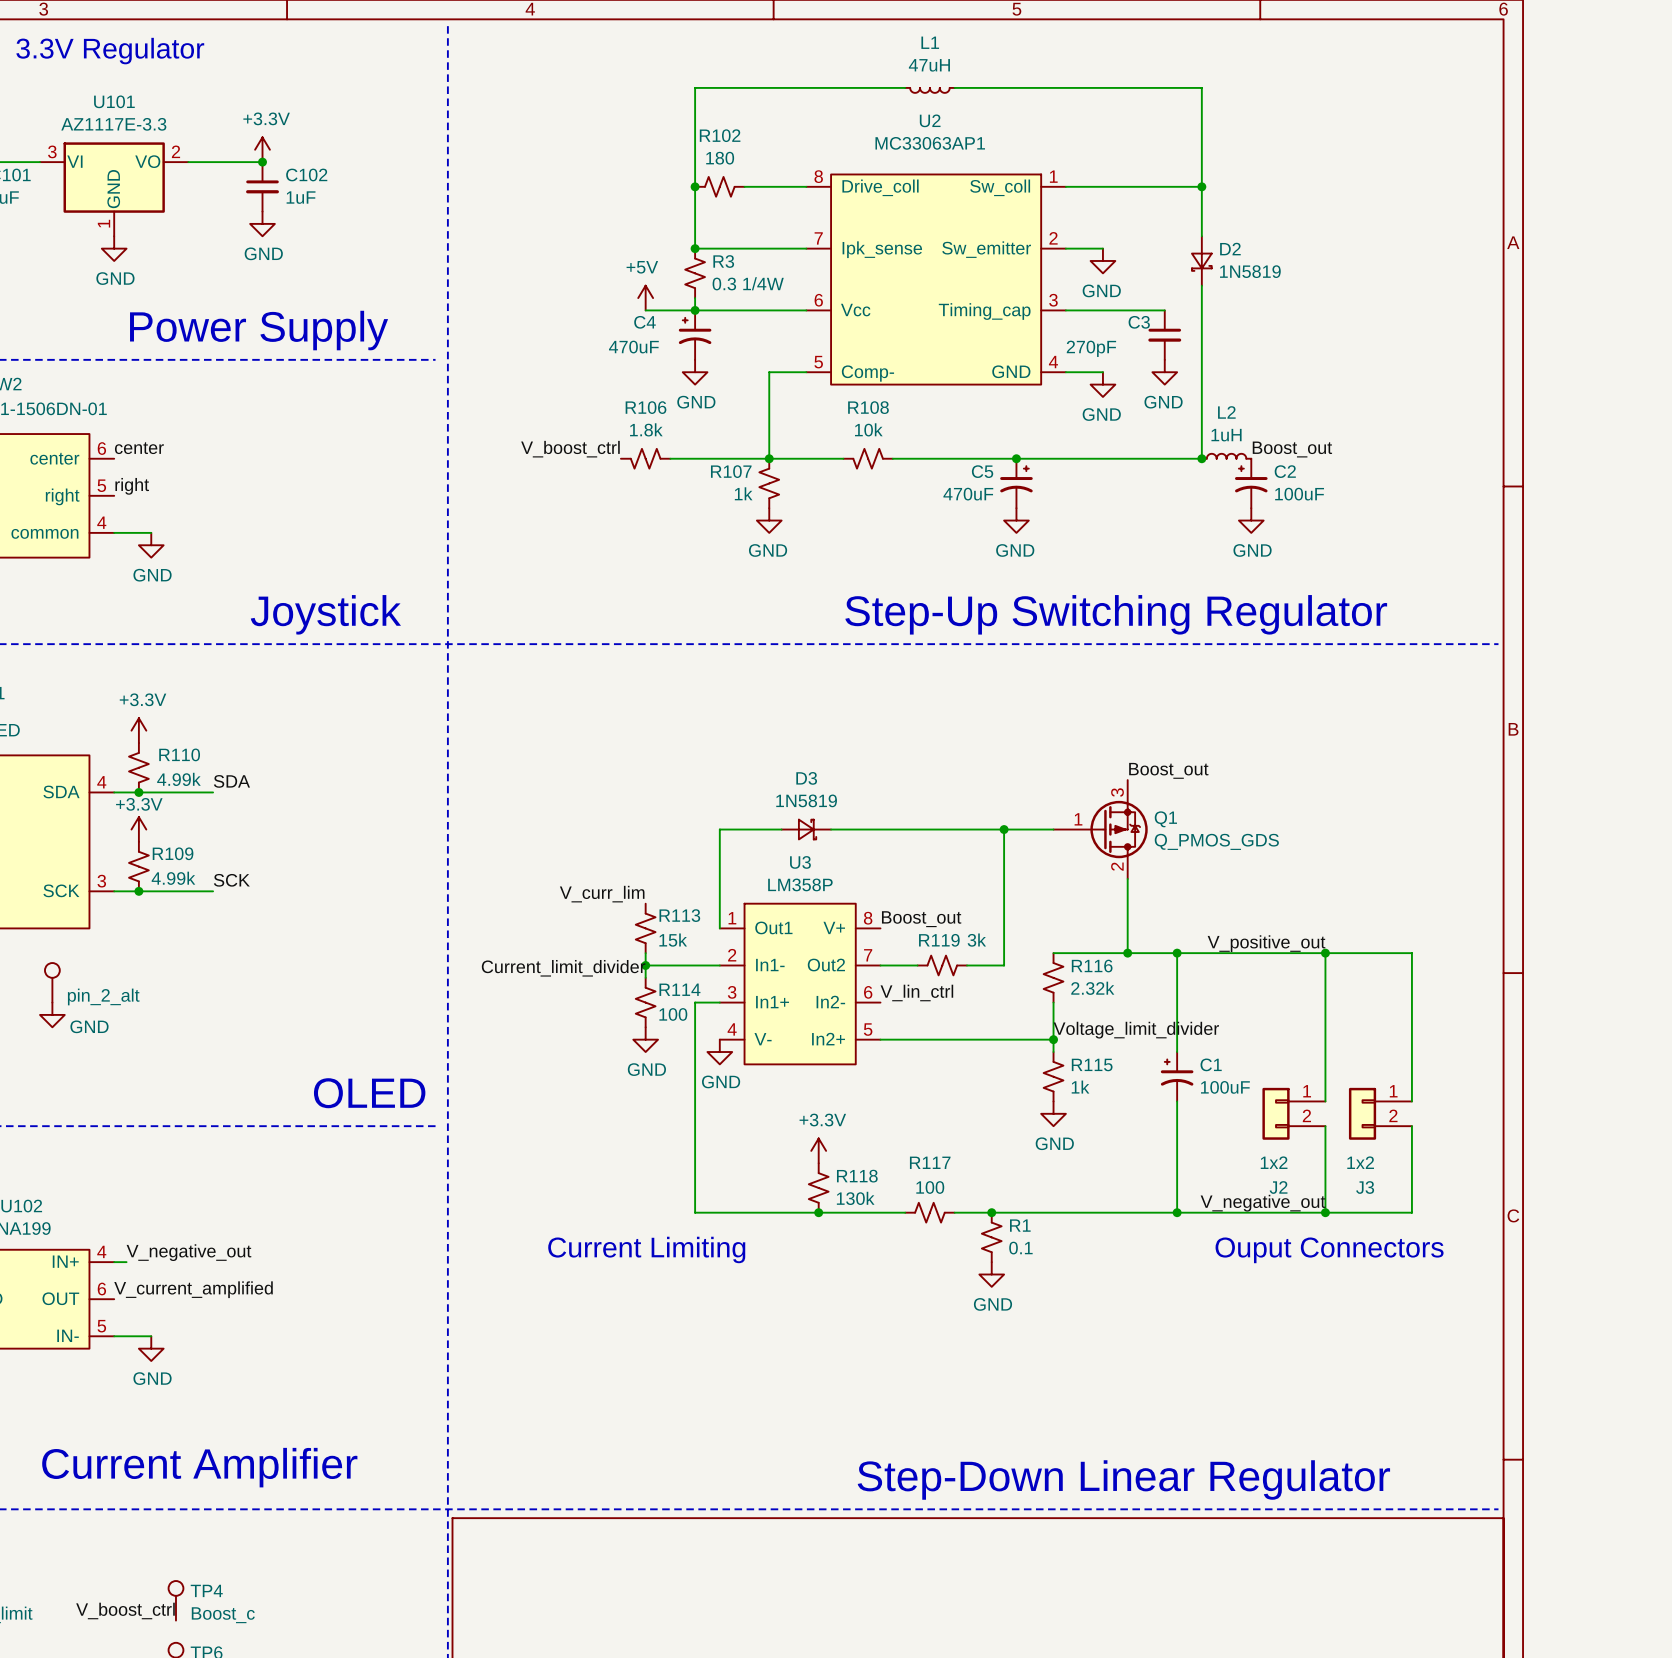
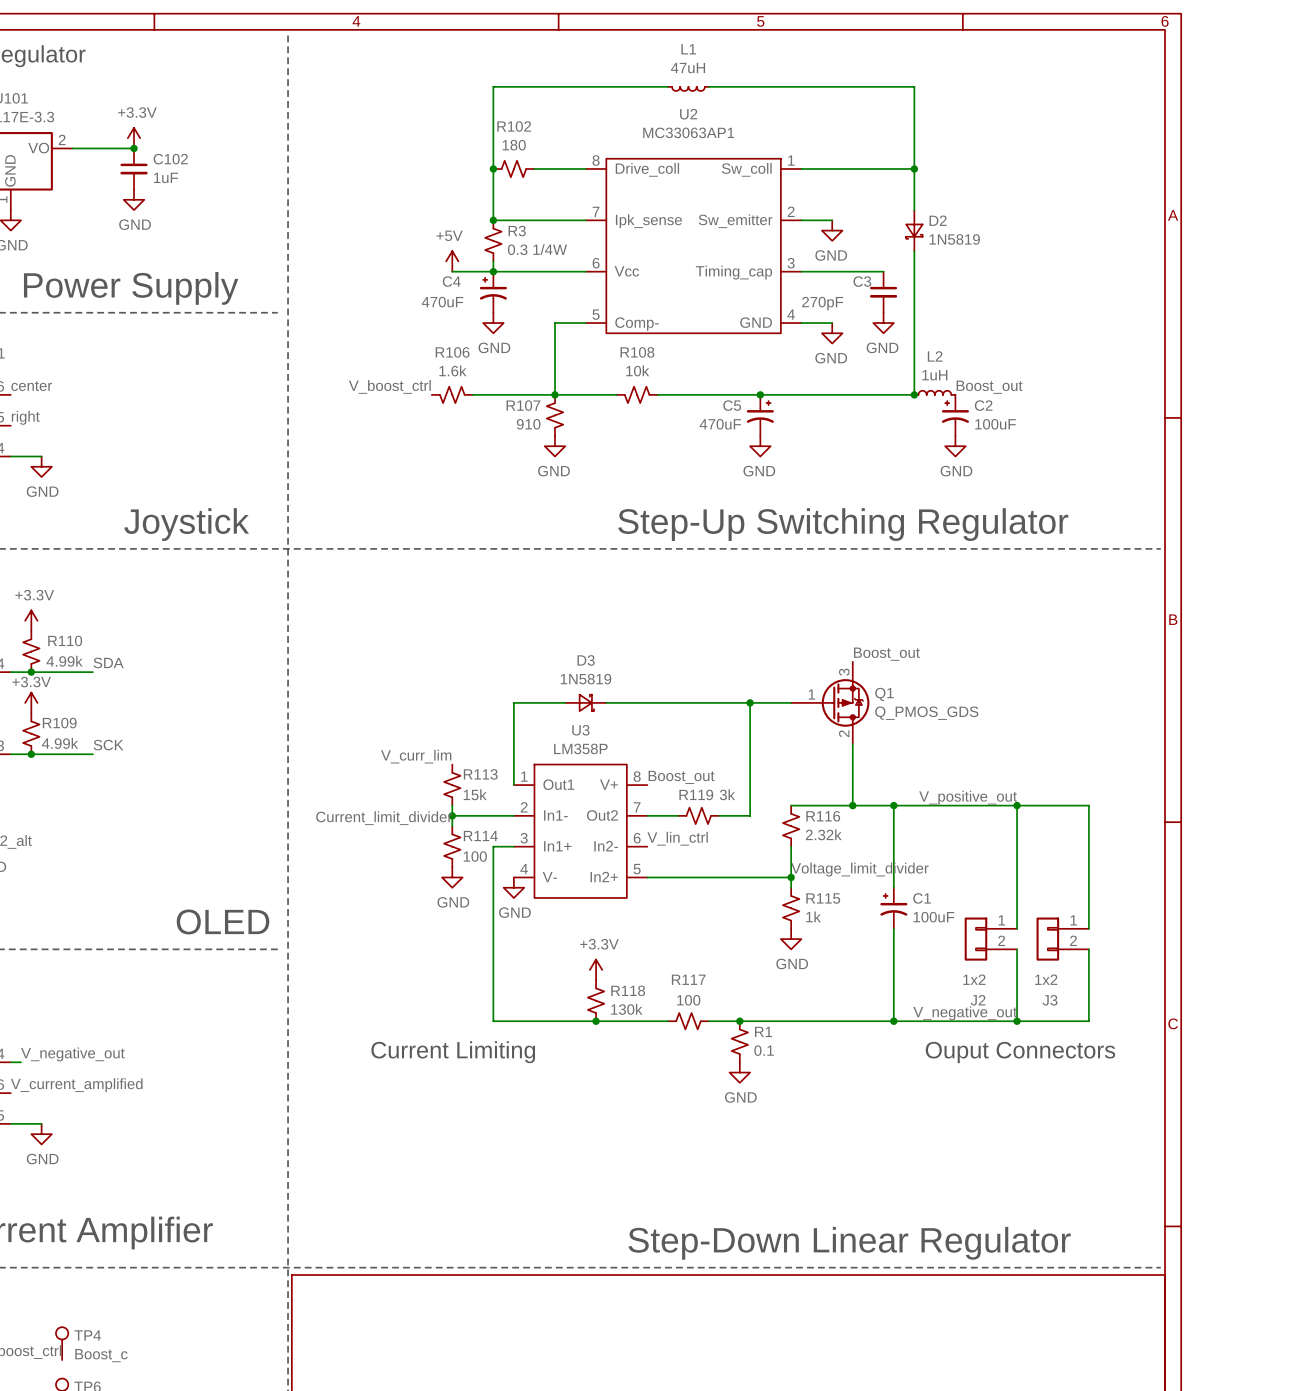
R106 value: 1.8k (646, 429) -> 1.6k (452, 370)
R107 value: 1k (743, 493) -> 910 (528, 424)

